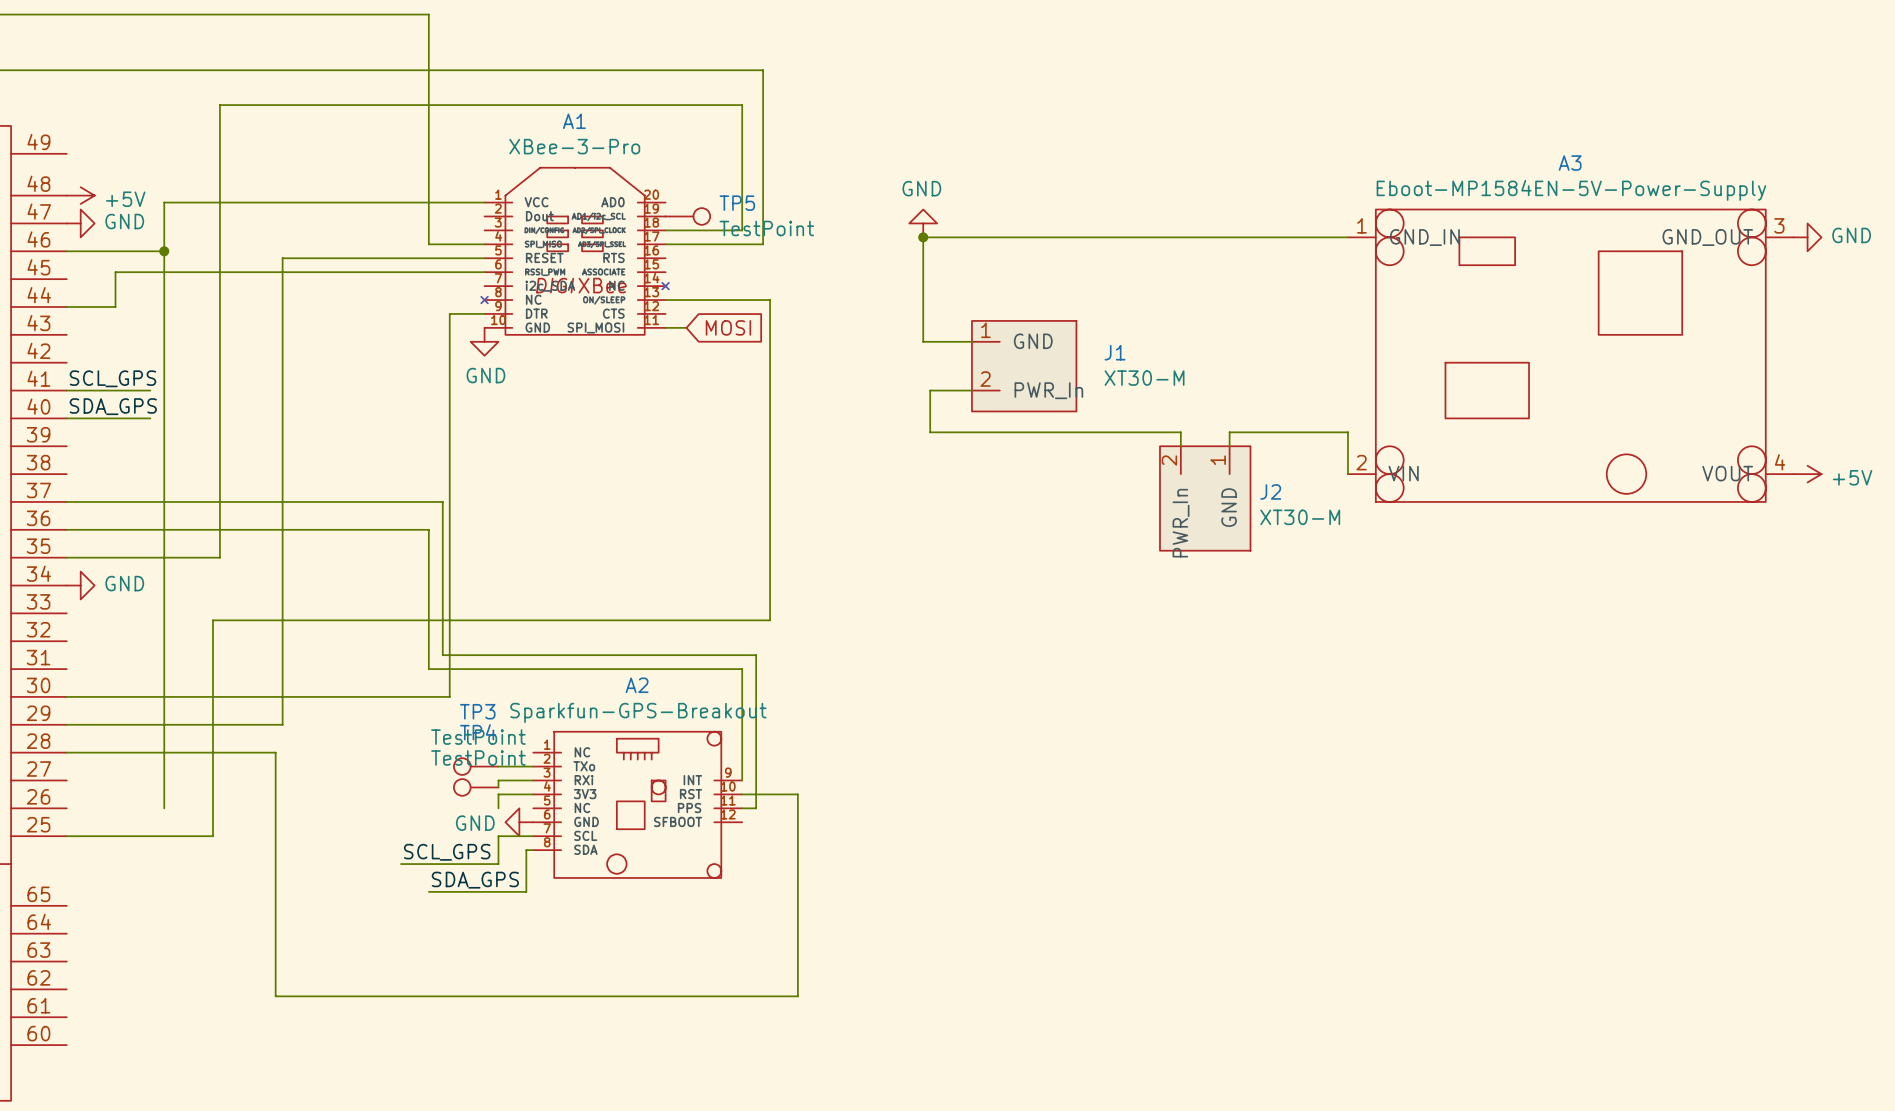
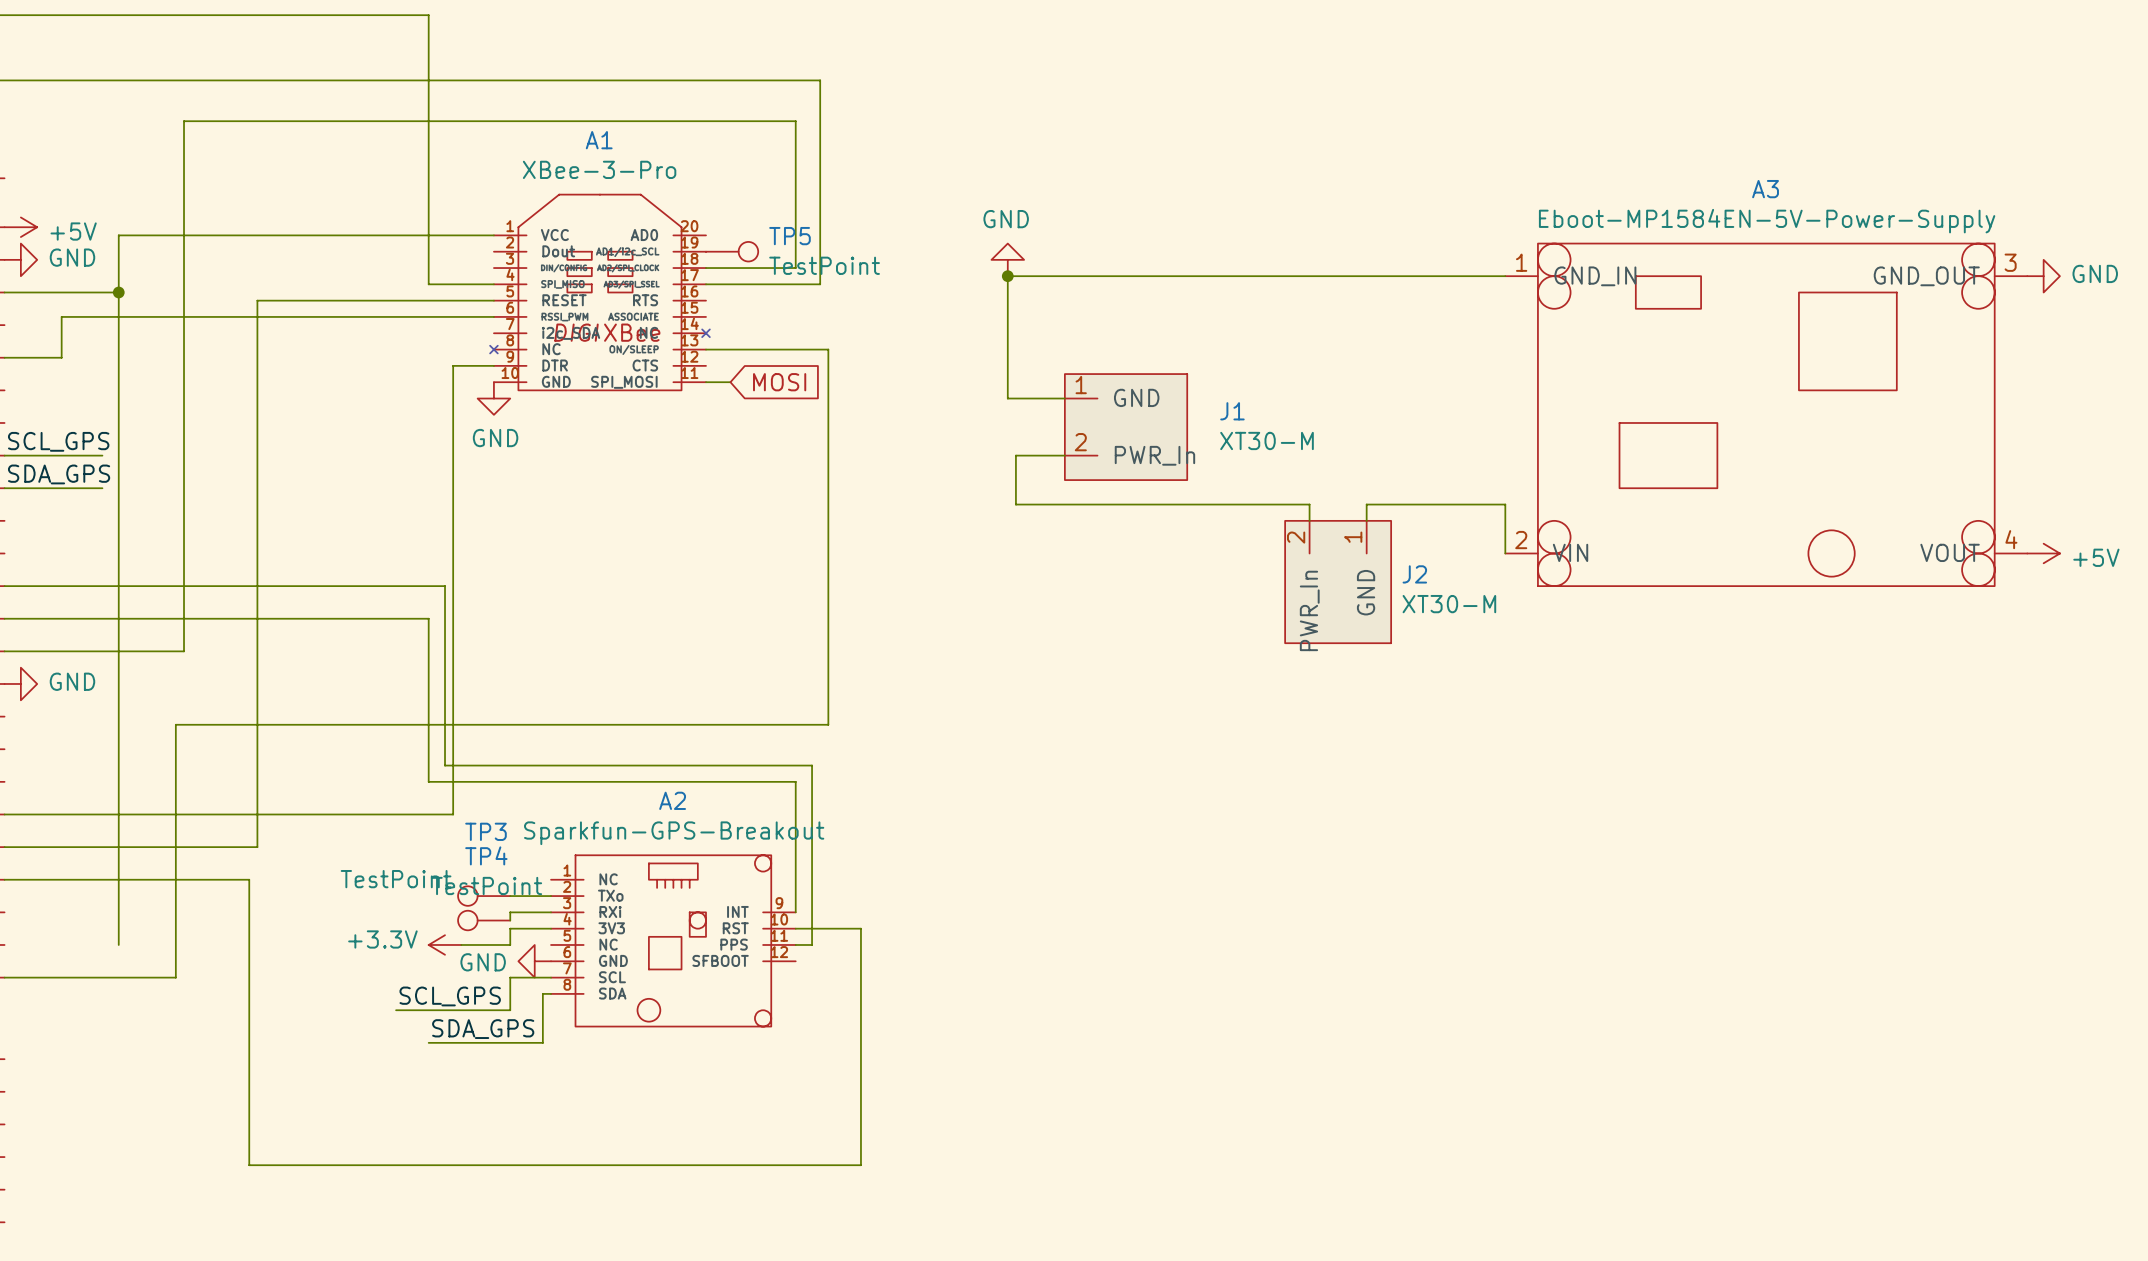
TP3 value position: TestPoint (478, 737) -> TestPoint (396, 879)
power symbol: none -> +3.3V (445, 944)
wire: none -> (461, 944) (510, 944)

